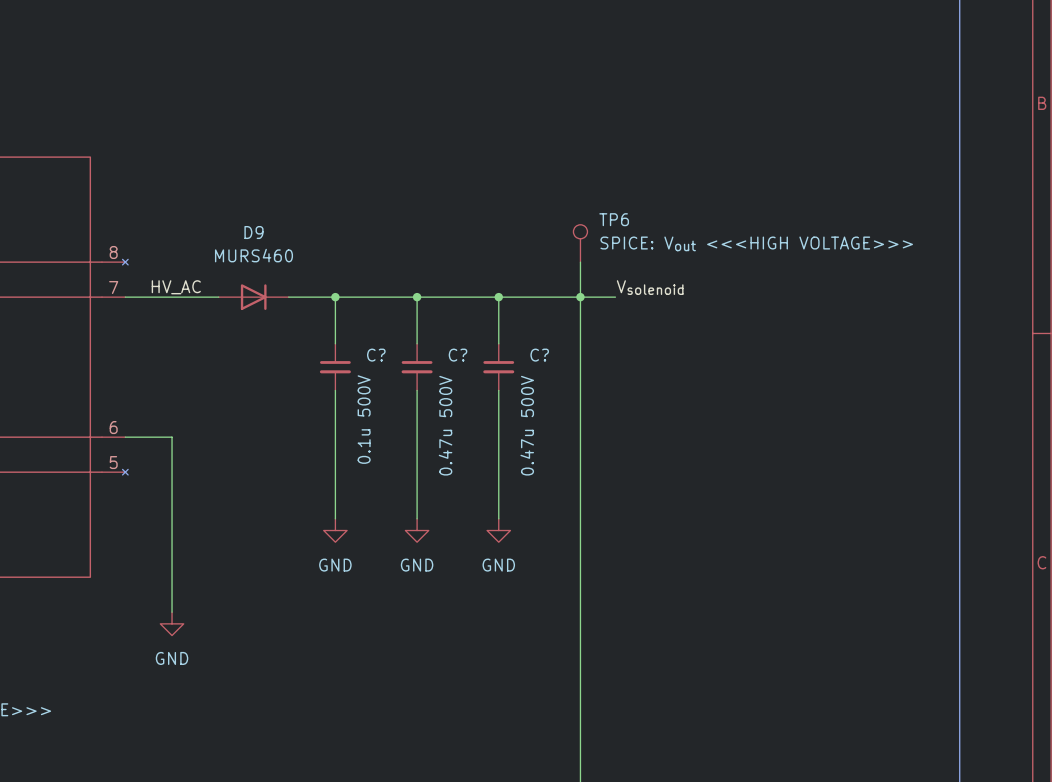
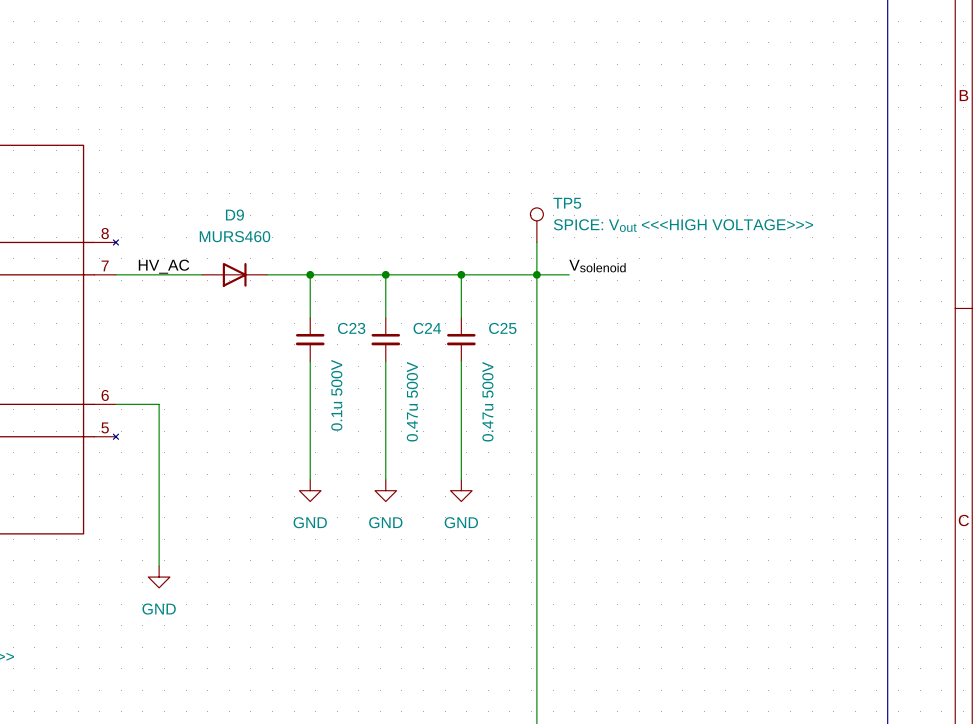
TP6 name: TP6 (614, 219) -> TP5 (567, 203)
C? name: C? (376, 355) -> C23 (351, 328)
C? name: C? (458, 355) -> C24 (427, 328)
C? name: C? (539, 355) -> C25 (502, 328)

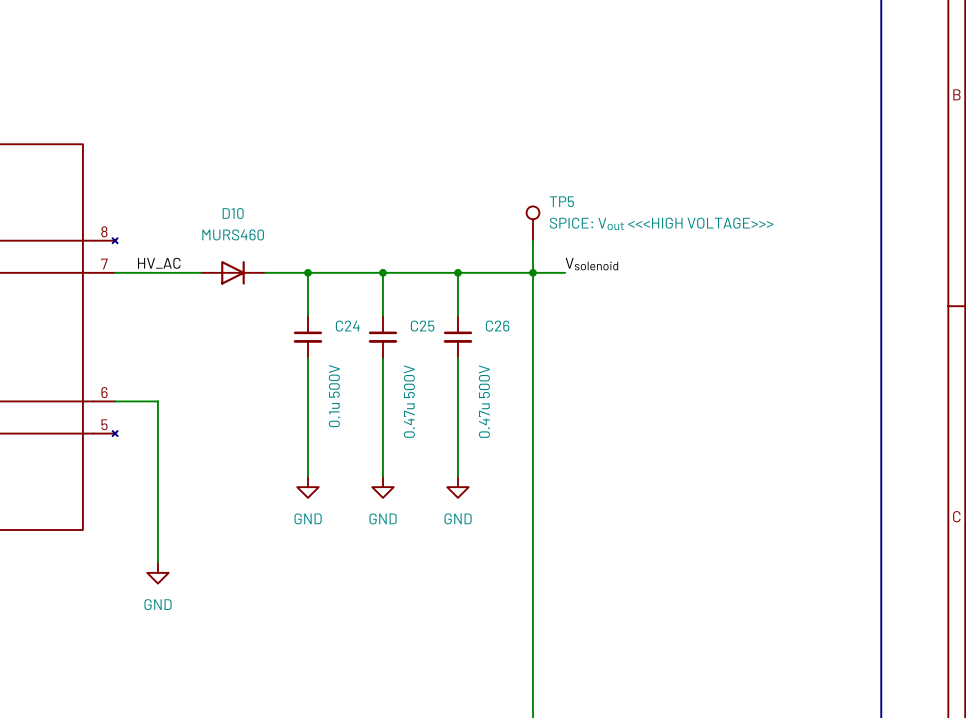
D9 name: D9 (234, 215) -> D10 (233, 213)
C23 name: C23 (351, 328) -> C24 (347, 326)
C24 name: C24 (427, 328) -> C25 (422, 326)
C25 name: C25 (502, 328) -> C26 (497, 326)

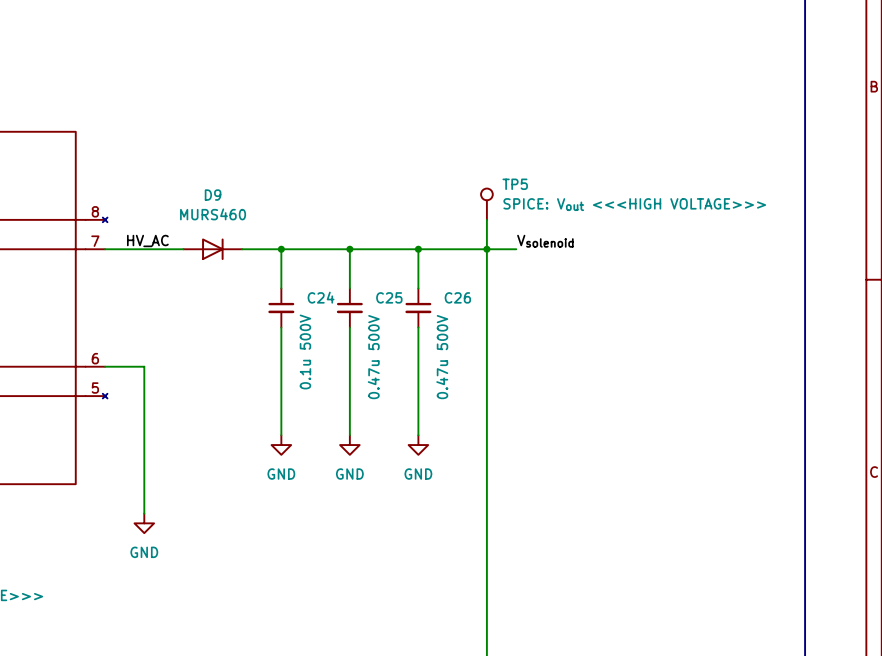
D10 name: D10 (233, 213) -> D9 (213, 195)

